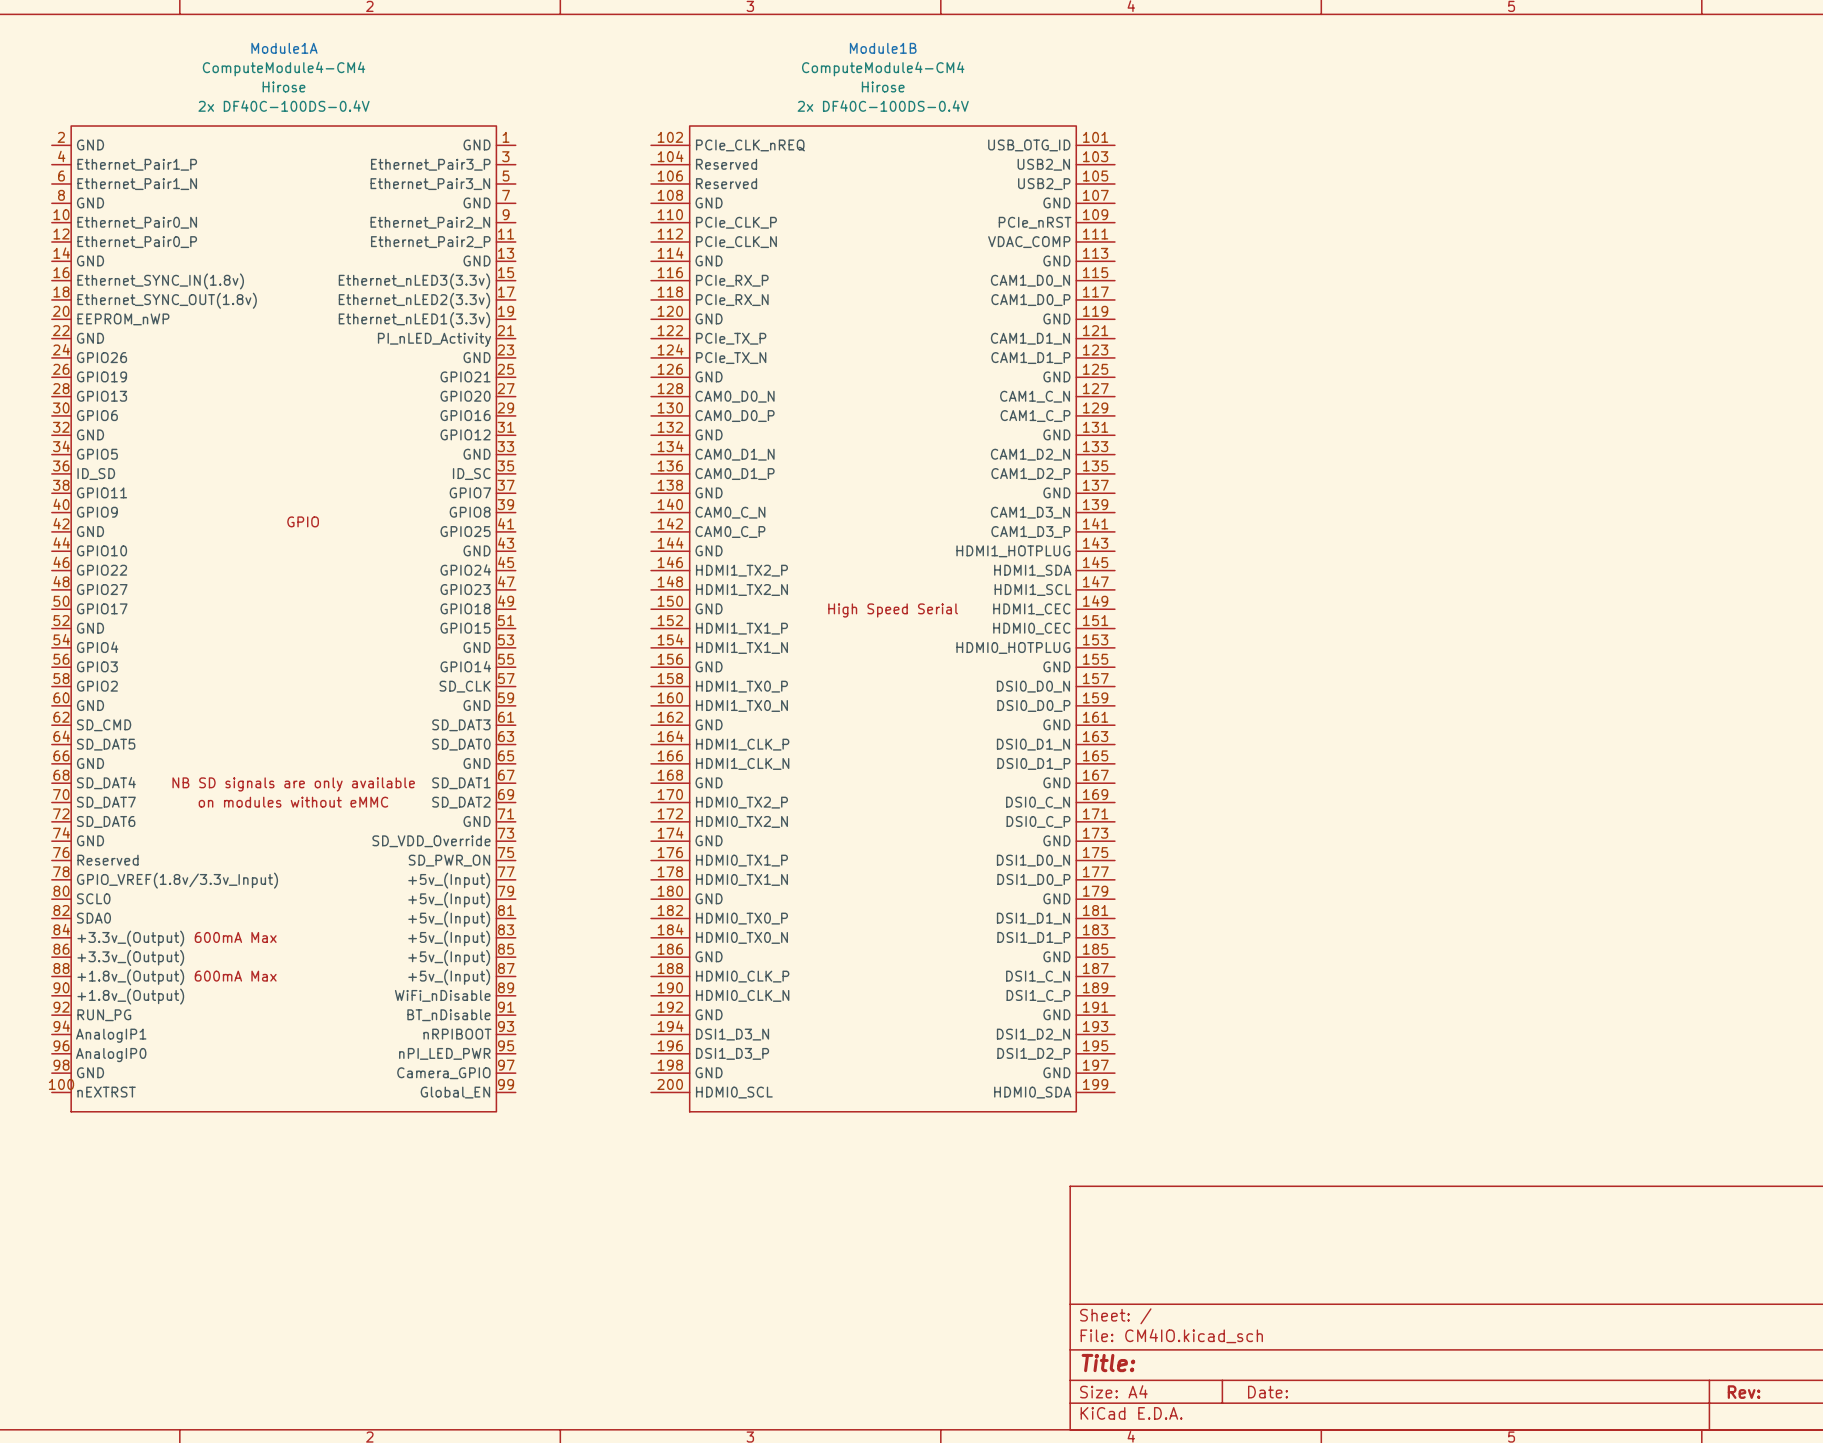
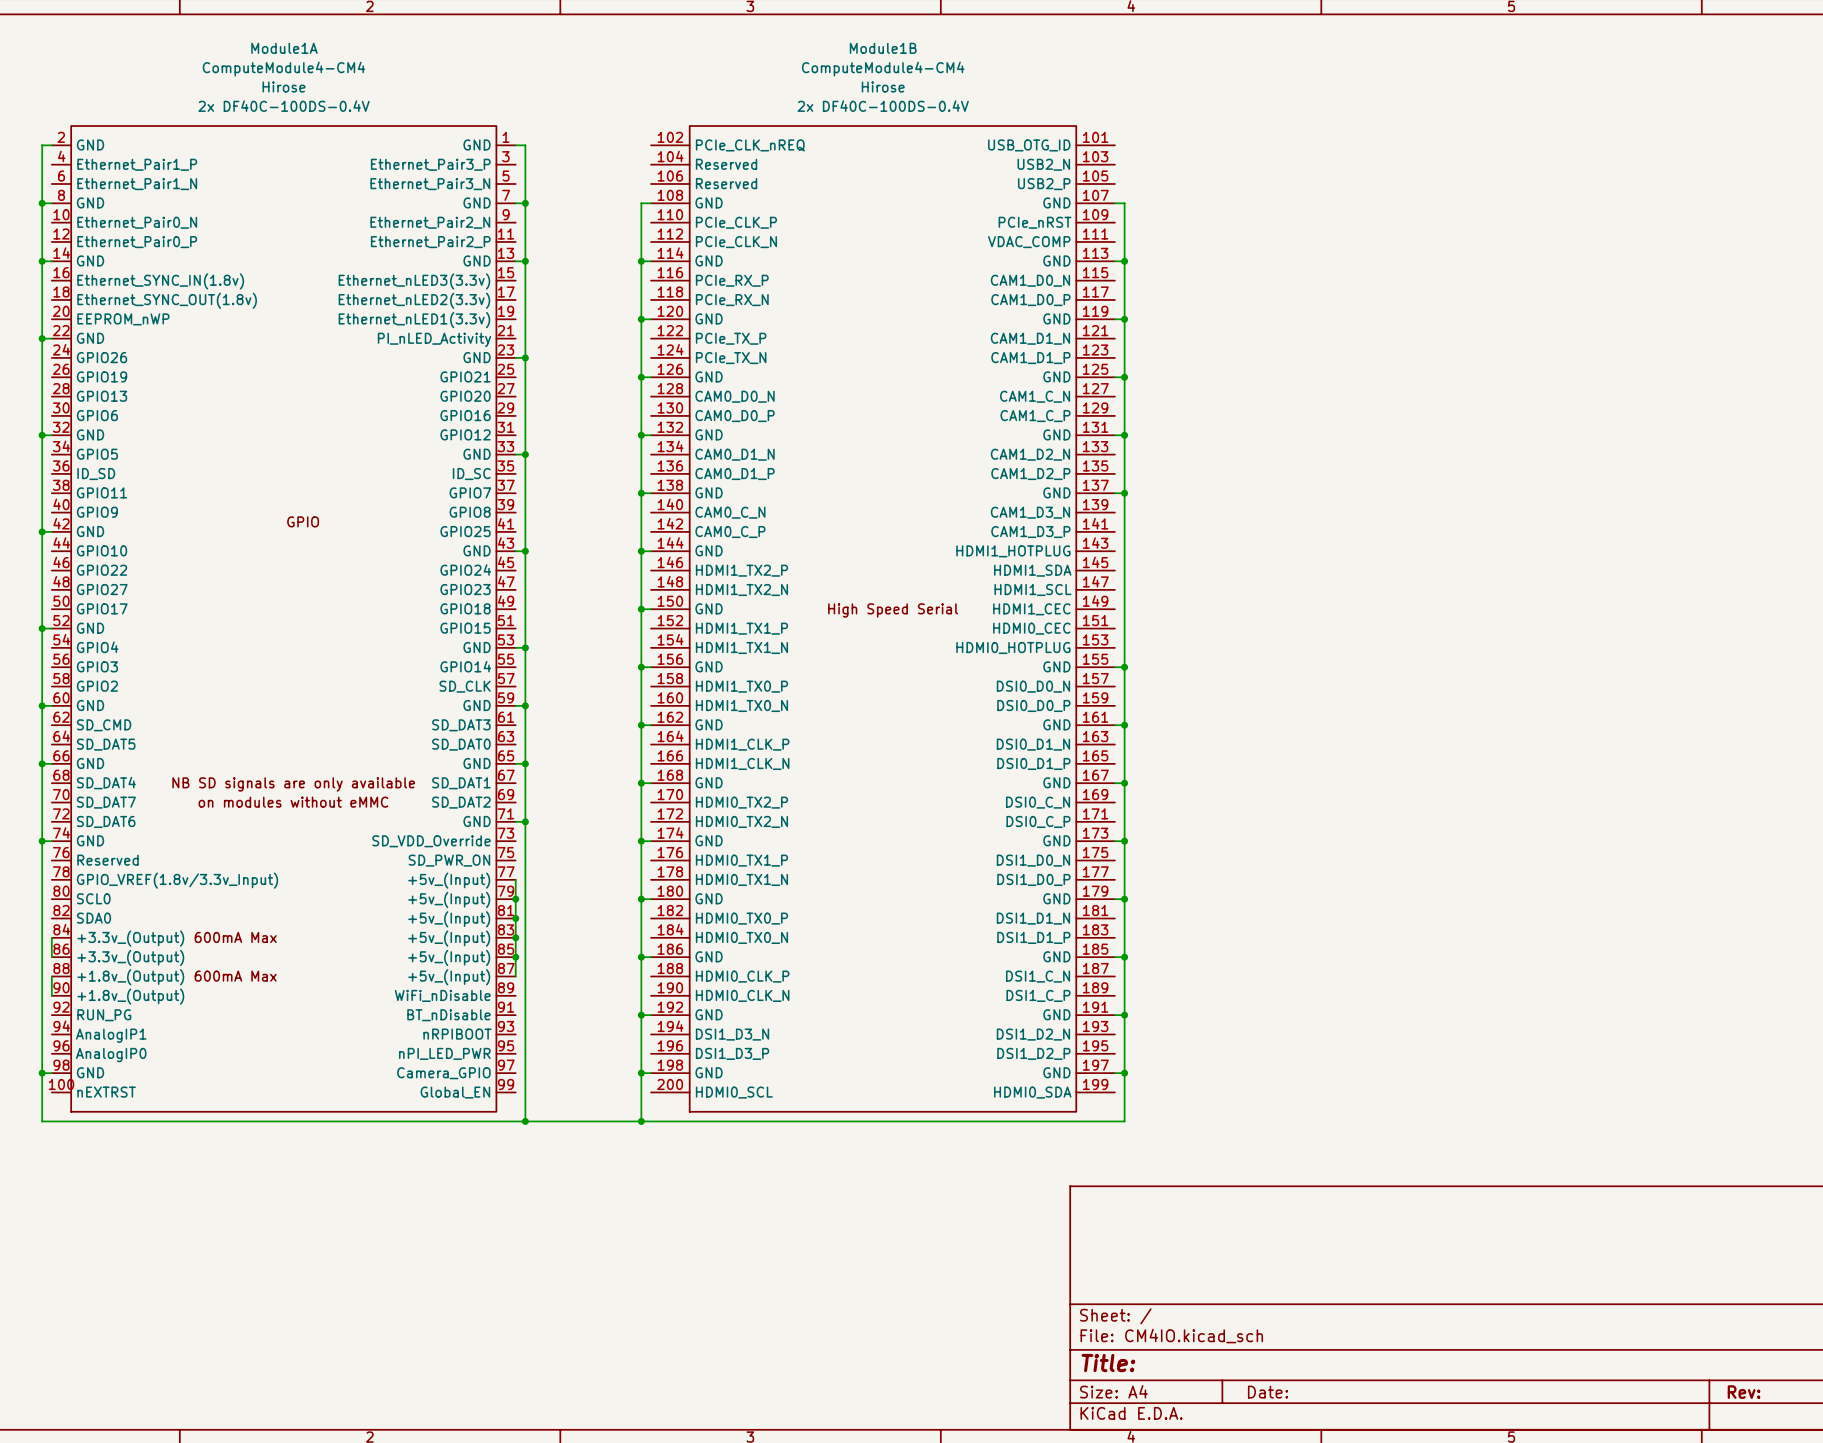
wire: none -> (51, 145) (42, 145) (42, 1121) (1124, 1121) (1124, 203) (1114, 203)
wire: none -> (515, 145) (525, 145) (525, 1121)
wire: none -> (42, 203) (51, 203)
junction: none -> (42, 203)
wire: none -> (515, 203) (525, 203)
junction: none -> (525, 203)
wire: none -> (651, 203) (641, 203) (641, 1121)
wire: none -> (42, 261) (51, 261)
junction: none -> (42, 261)
wire: none -> (515, 261) (525, 261)
junction: none -> (525, 261)
wire: none -> (641, 261) (651, 261)
junction: none -> (641, 261)
wire: none -> (1114, 261) (1124, 261)
junction: none -> (1124, 261)
wire: none -> (641, 319) (651, 319)
junction: none -> (641, 319)
wire: none -> (1114, 319) (1124, 319)
junction: none -> (1124, 319)
wire: none -> (42, 338) (51, 338)
junction: none -> (42, 338)
wire: none -> (515, 357) (525, 357)
junction: none -> (525, 357)
wire: none -> (641, 377) (651, 377)
junction: none -> (641, 377)
wire: none -> (1114, 377) (1124, 377)
junction: none -> (1124, 377)
wire: none -> (42, 435) (51, 435)
junction: none -> (42, 435)
wire: none -> (641, 435) (651, 435)
junction: none -> (641, 435)
wire: none -> (1114, 435) (1124, 435)
junction: none -> (1124, 435)
wire: none -> (515, 454) (525, 454)
junction: none -> (525, 454)
wire: none -> (641, 493) (651, 493)
junction: none -> (641, 493)
wire: none -> (1114, 493) (1124, 493)
junction: none -> (1124, 493)
wire: none -> (42, 531) (51, 531)
junction: none -> (42, 531)
wire: none -> (515, 551) (525, 551)
junction: none -> (525, 551)
wire: none -> (641, 551) (651, 551)
junction: none -> (641, 551)
wire: none -> (641, 609) (651, 609)
junction: none -> (641, 609)
wire: none -> (42, 628) (51, 628)
junction: none -> (42, 628)
wire: none -> (515, 647) (525, 647)
junction: none -> (525, 647)
wire: none -> (641, 667) (651, 667)
junction: none -> (641, 667)
wire: none -> (1114, 667) (1124, 667)
junction: none -> (1124, 667)
wire: none -> (42, 705) (51, 705)
junction: none -> (42, 705)
wire: none -> (515, 705) (525, 705)
junction: none -> (525, 705)
wire: none -> (641, 725) (651, 725)
junction: none -> (641, 725)
wire: none -> (1114, 725) (1124, 725)
junction: none -> (1124, 725)
wire: none -> (42, 763) (51, 763)
junction: none -> (42, 763)
wire: none -> (515, 763) (525, 763)
junction: none -> (525, 763)
wire: none -> (641, 783) (651, 783)
junction: none -> (641, 783)
wire: none -> (1114, 783) (1124, 783)
junction: none -> (1124, 783)
wire: none -> (515, 821) (525, 821)
junction: none -> (525, 821)
wire: none -> (42, 841) (51, 841)
junction: none -> (42, 841)
wire: none -> (641, 841) (651, 841)
junction: none -> (641, 841)
wire: none -> (1114, 841) (1124, 841)
junction: none -> (1124, 841)
wire: none -> (515, 879) (515, 976)
junction: none -> (515, 899)
wire: none -> (641, 899) (651, 899)
junction: none -> (641, 899)
wire: none -> (1114, 899) (1124, 899)
junction: none -> (1124, 899)
junction: none -> (515, 918)
wire: none -> (51, 937) (51, 957)
junction: none -> (515, 937)
junction: none -> (515, 957)
wire: none -> (641, 957) (651, 957)
junction: none -> (641, 957)
wire: none -> (1114, 957) (1124, 957)
junction: none -> (1124, 957)
wire: none -> (51, 976) (51, 995)
wire: none -> (641, 1015) (651, 1015)
junction: none -> (641, 1015)
wire: none -> (1114, 1015) (1124, 1015)
junction: none -> (1124, 1015)
wire: none -> (42, 1073) (51, 1073)
junction: none -> (42, 1073)
wire: none -> (641, 1073) (651, 1073)
junction: none -> (641, 1073)
wire: none -> (1114, 1073) (1124, 1073)
junction: none -> (1124, 1073)
junction: none -> (525, 1121)
junction: none -> (641, 1121)

